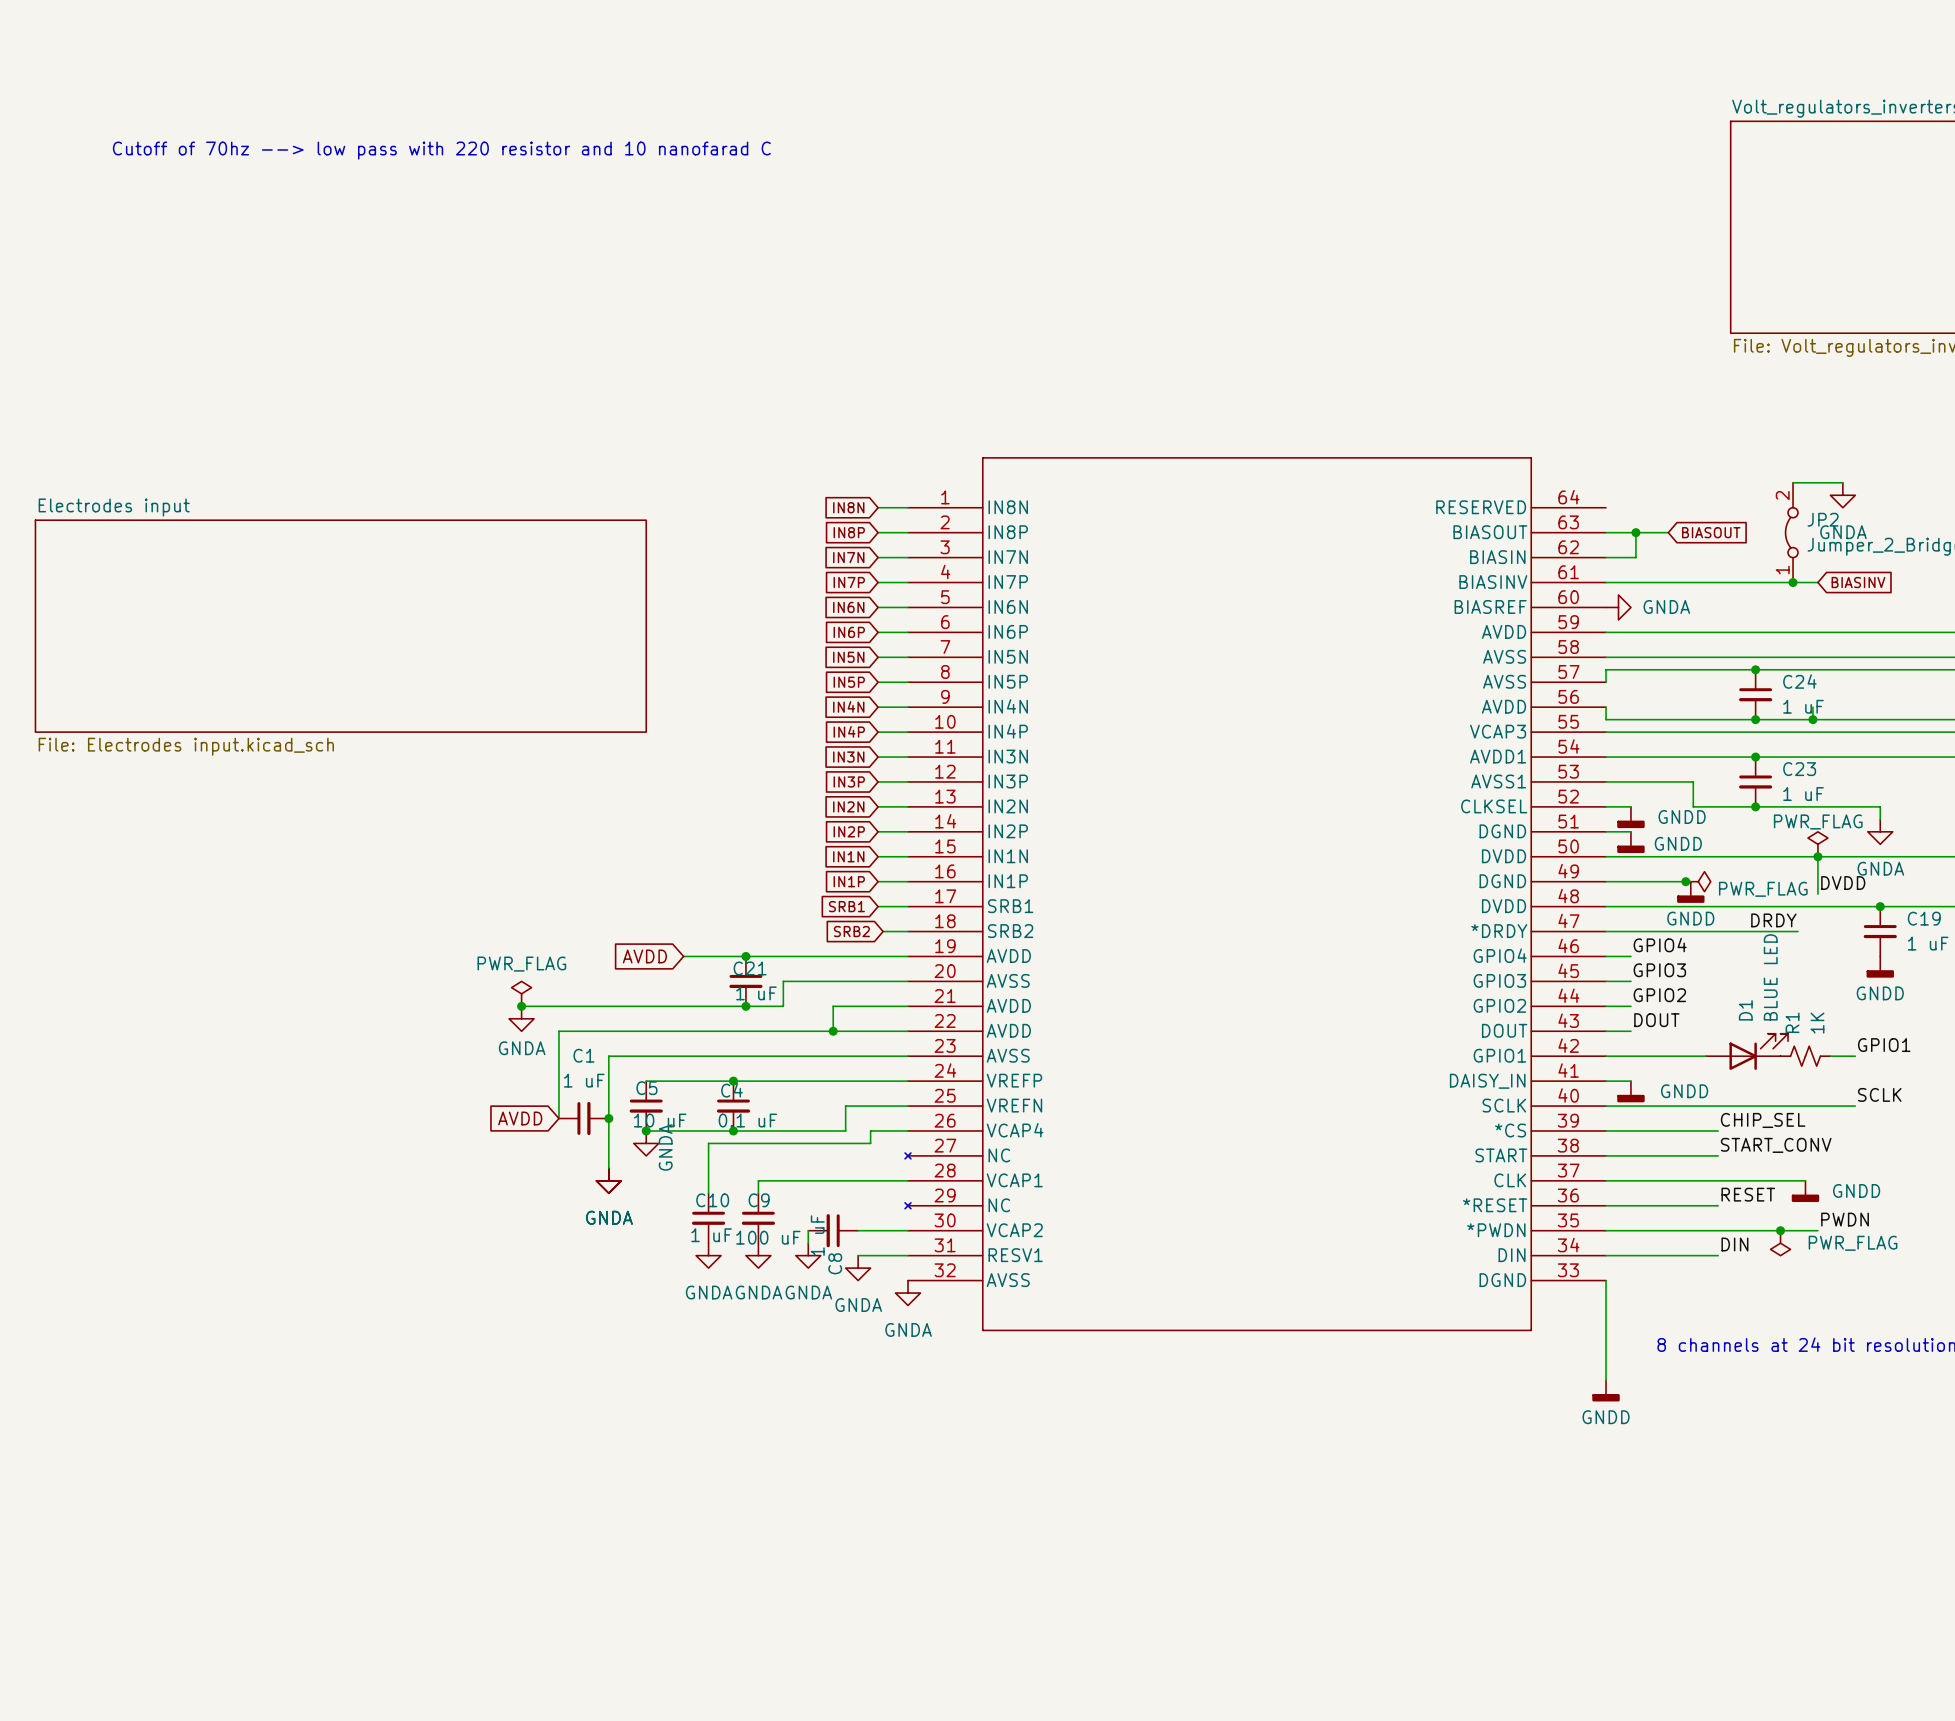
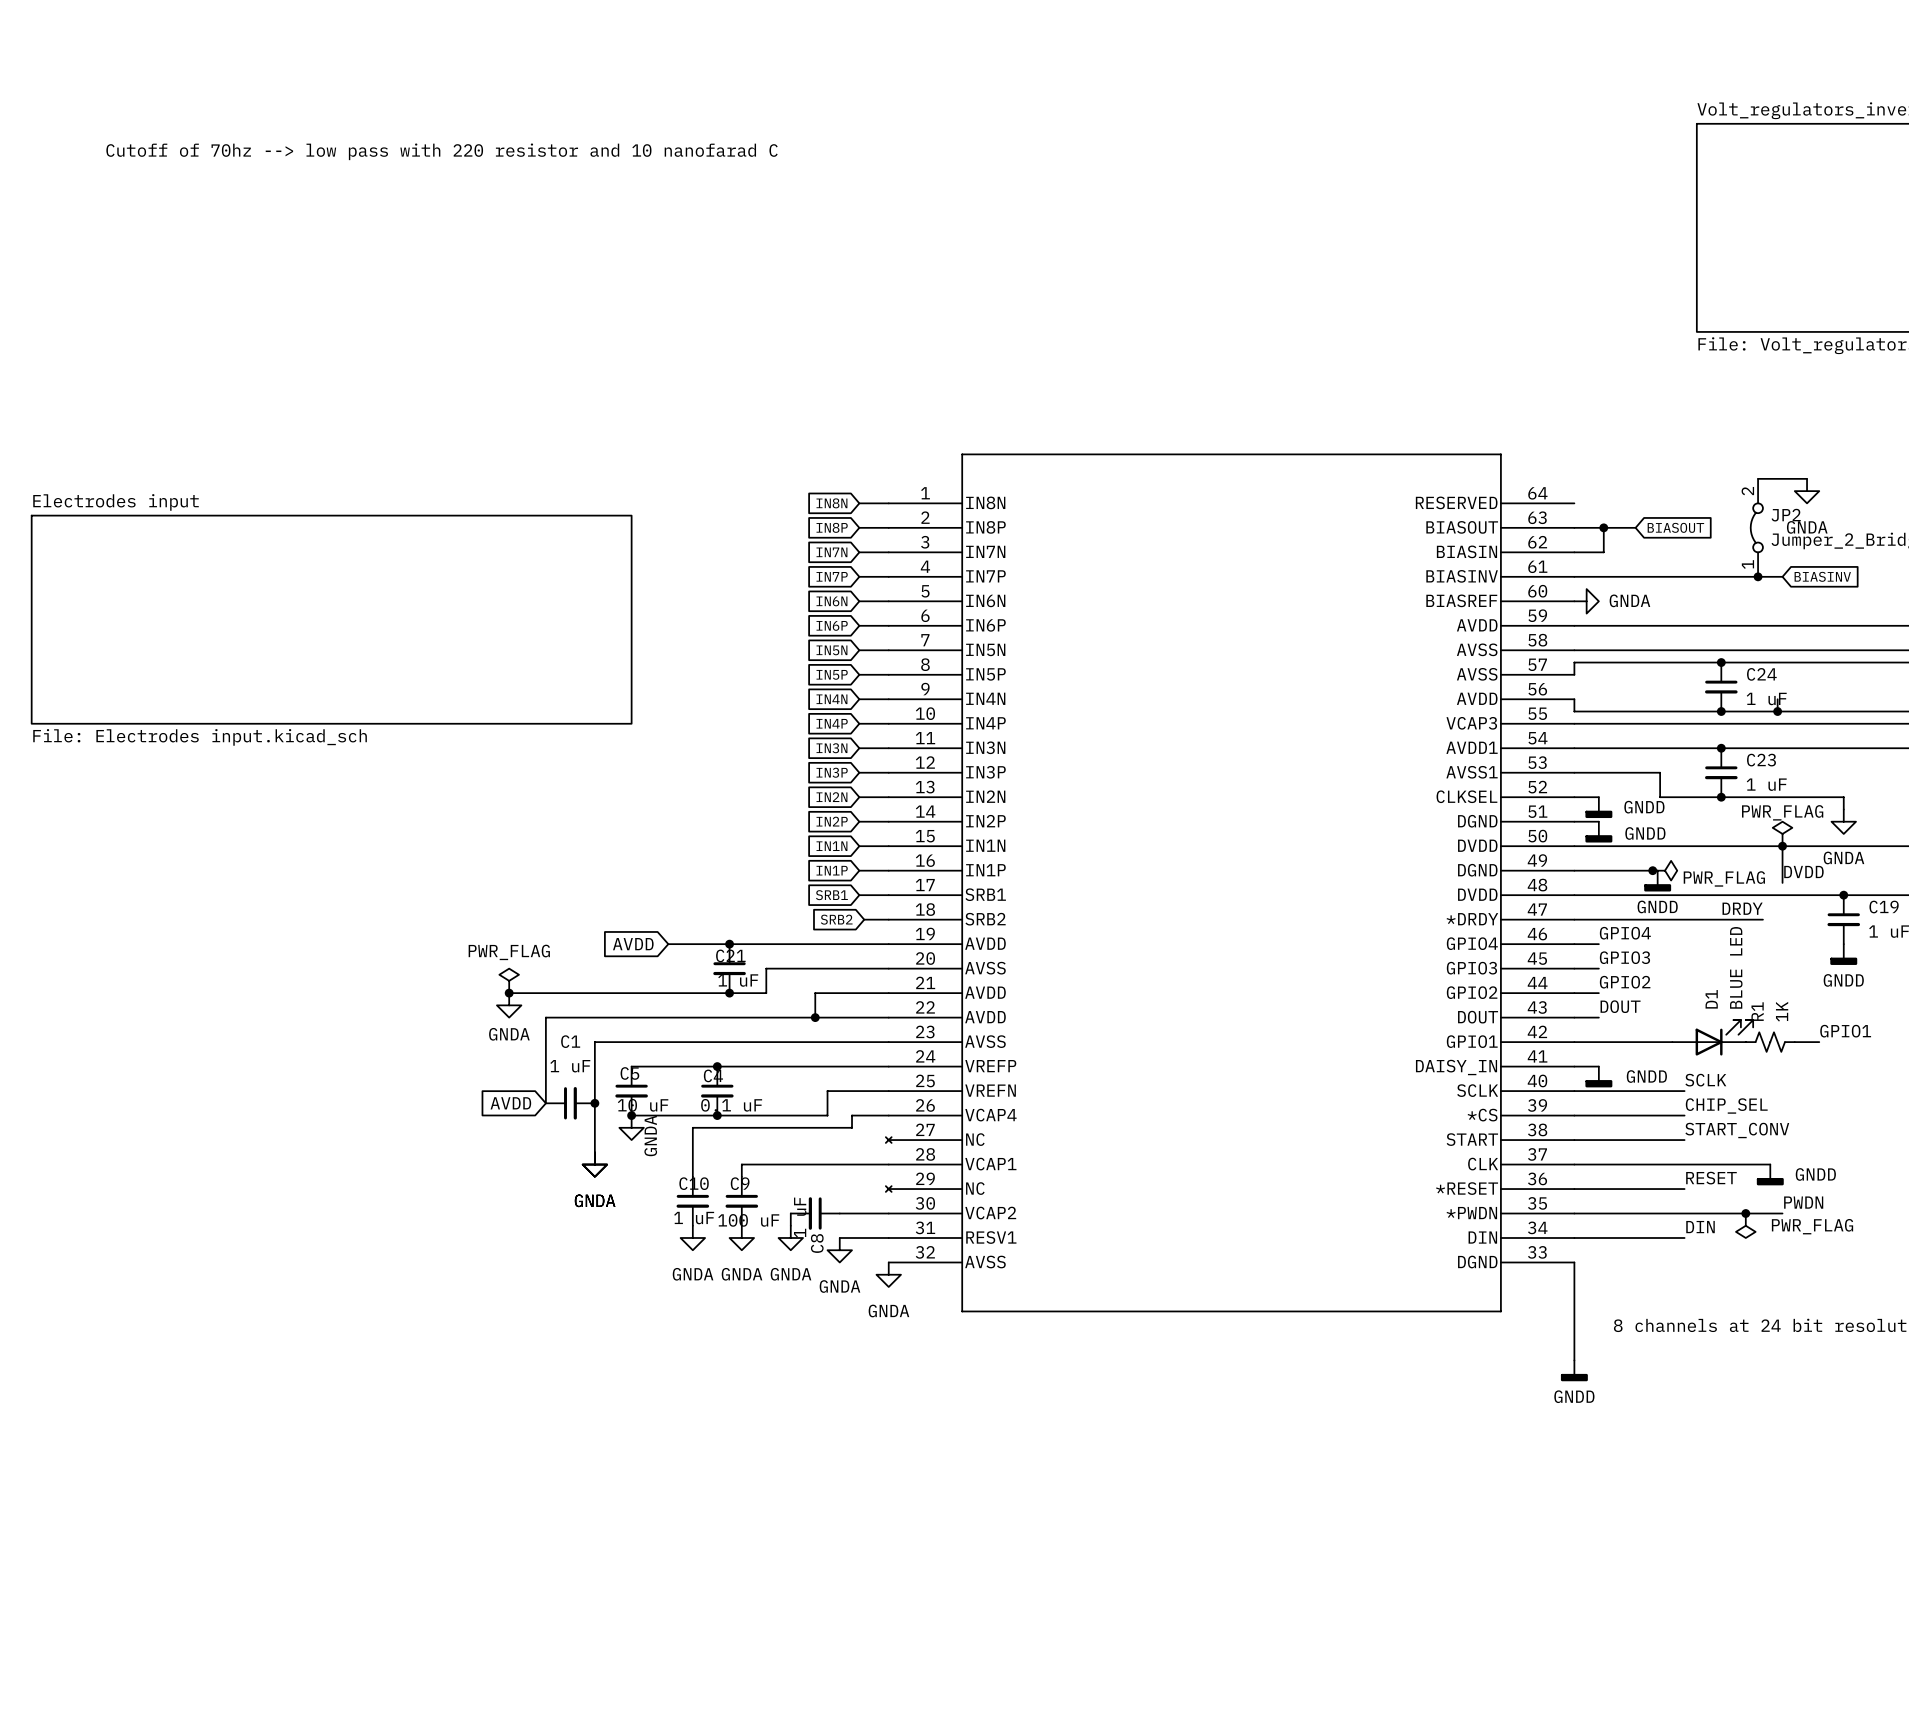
label position: SCLK (1879, 1094) -> SCLK (1705, 1080)
wire: (1718, 1106) (1855, 1106) -> none

